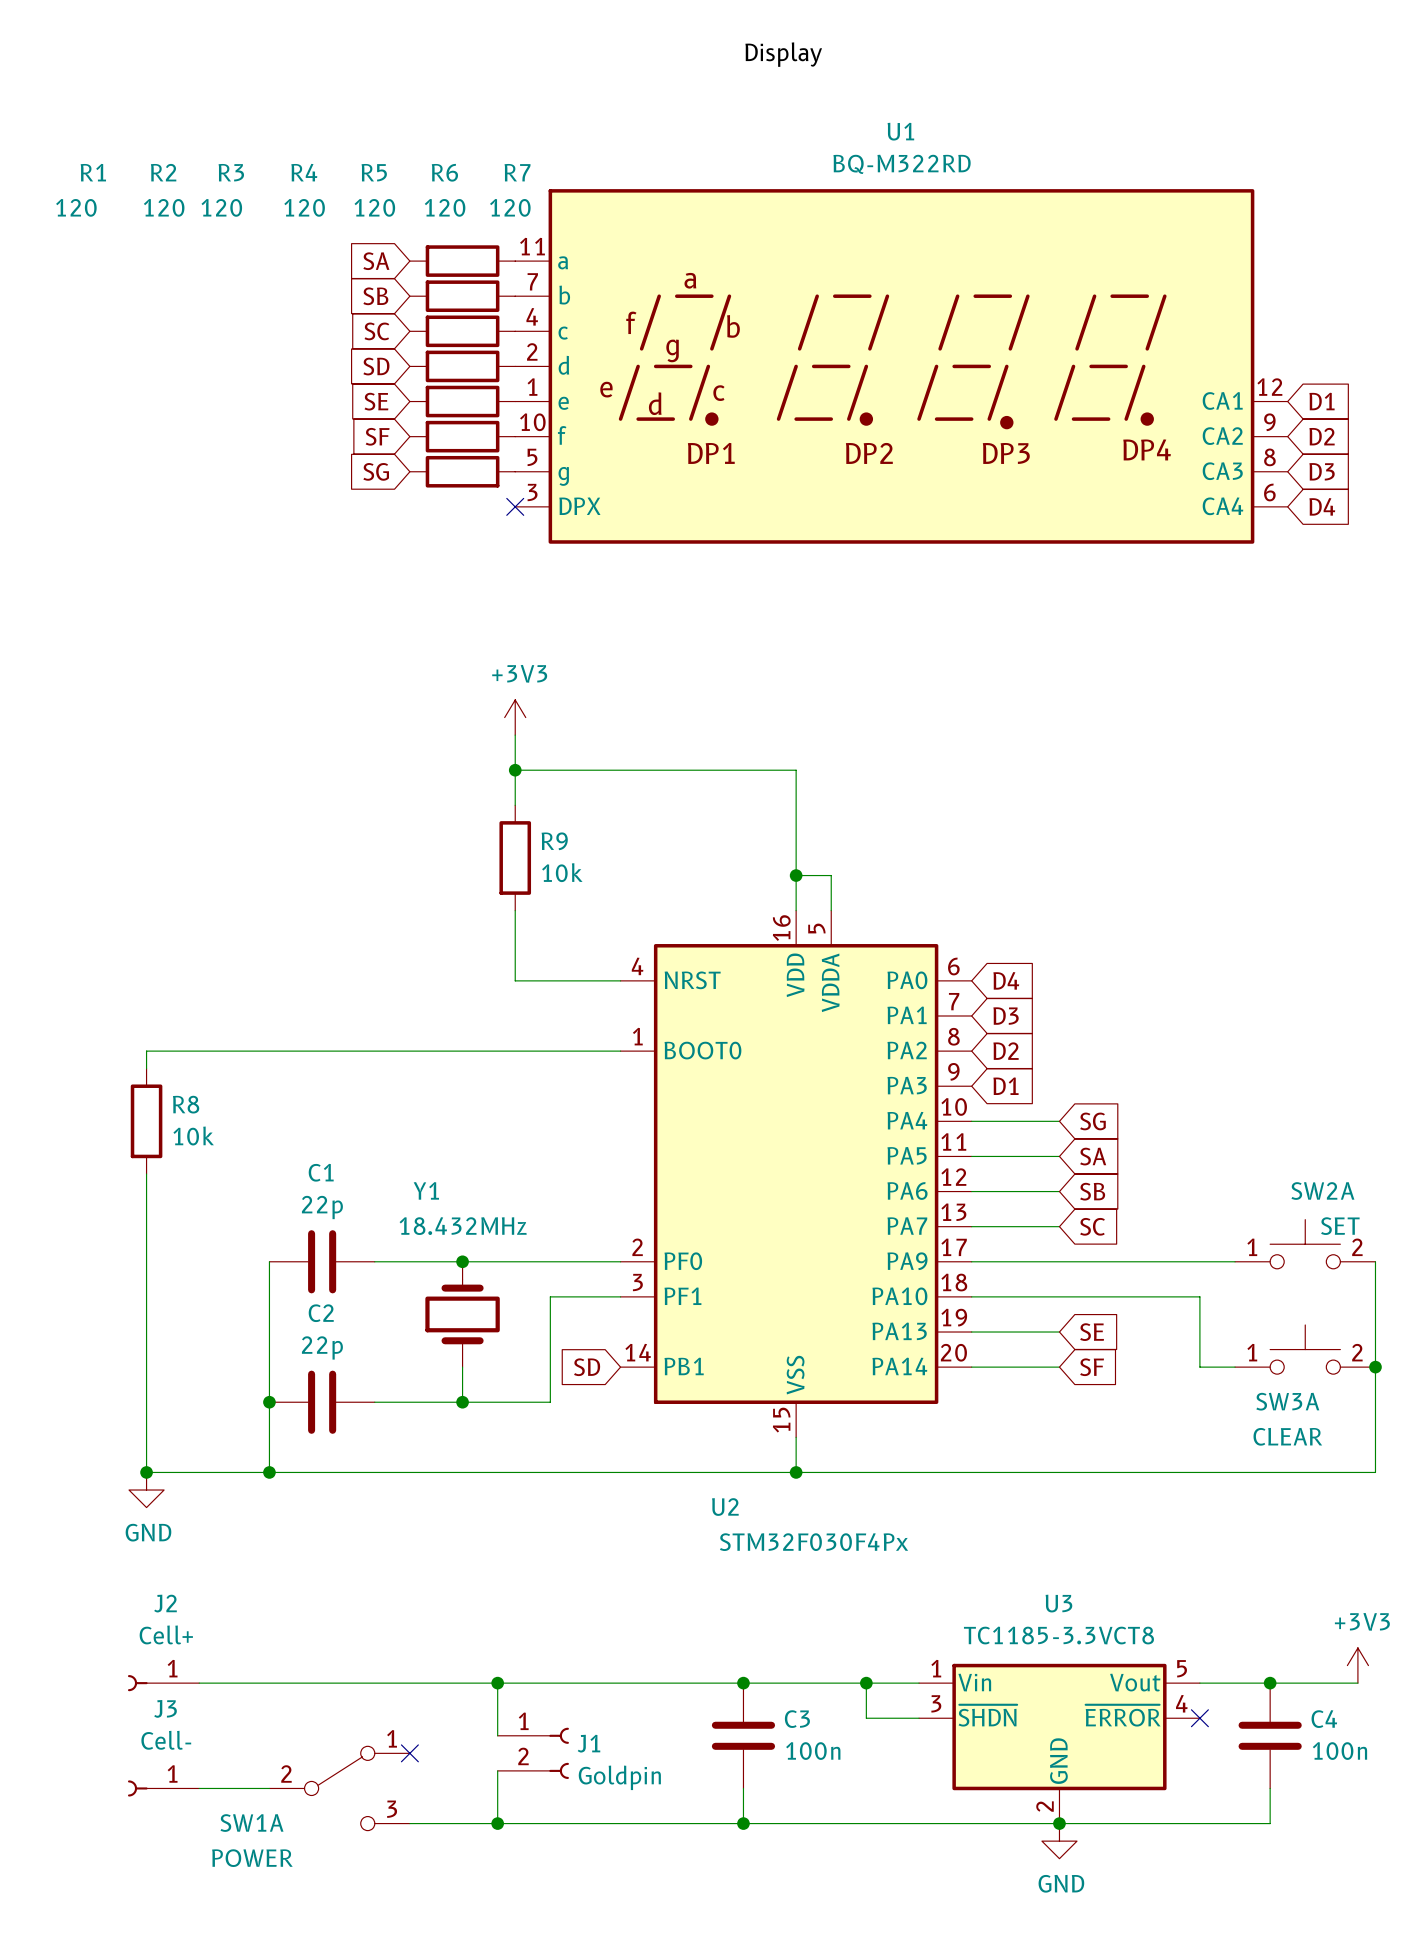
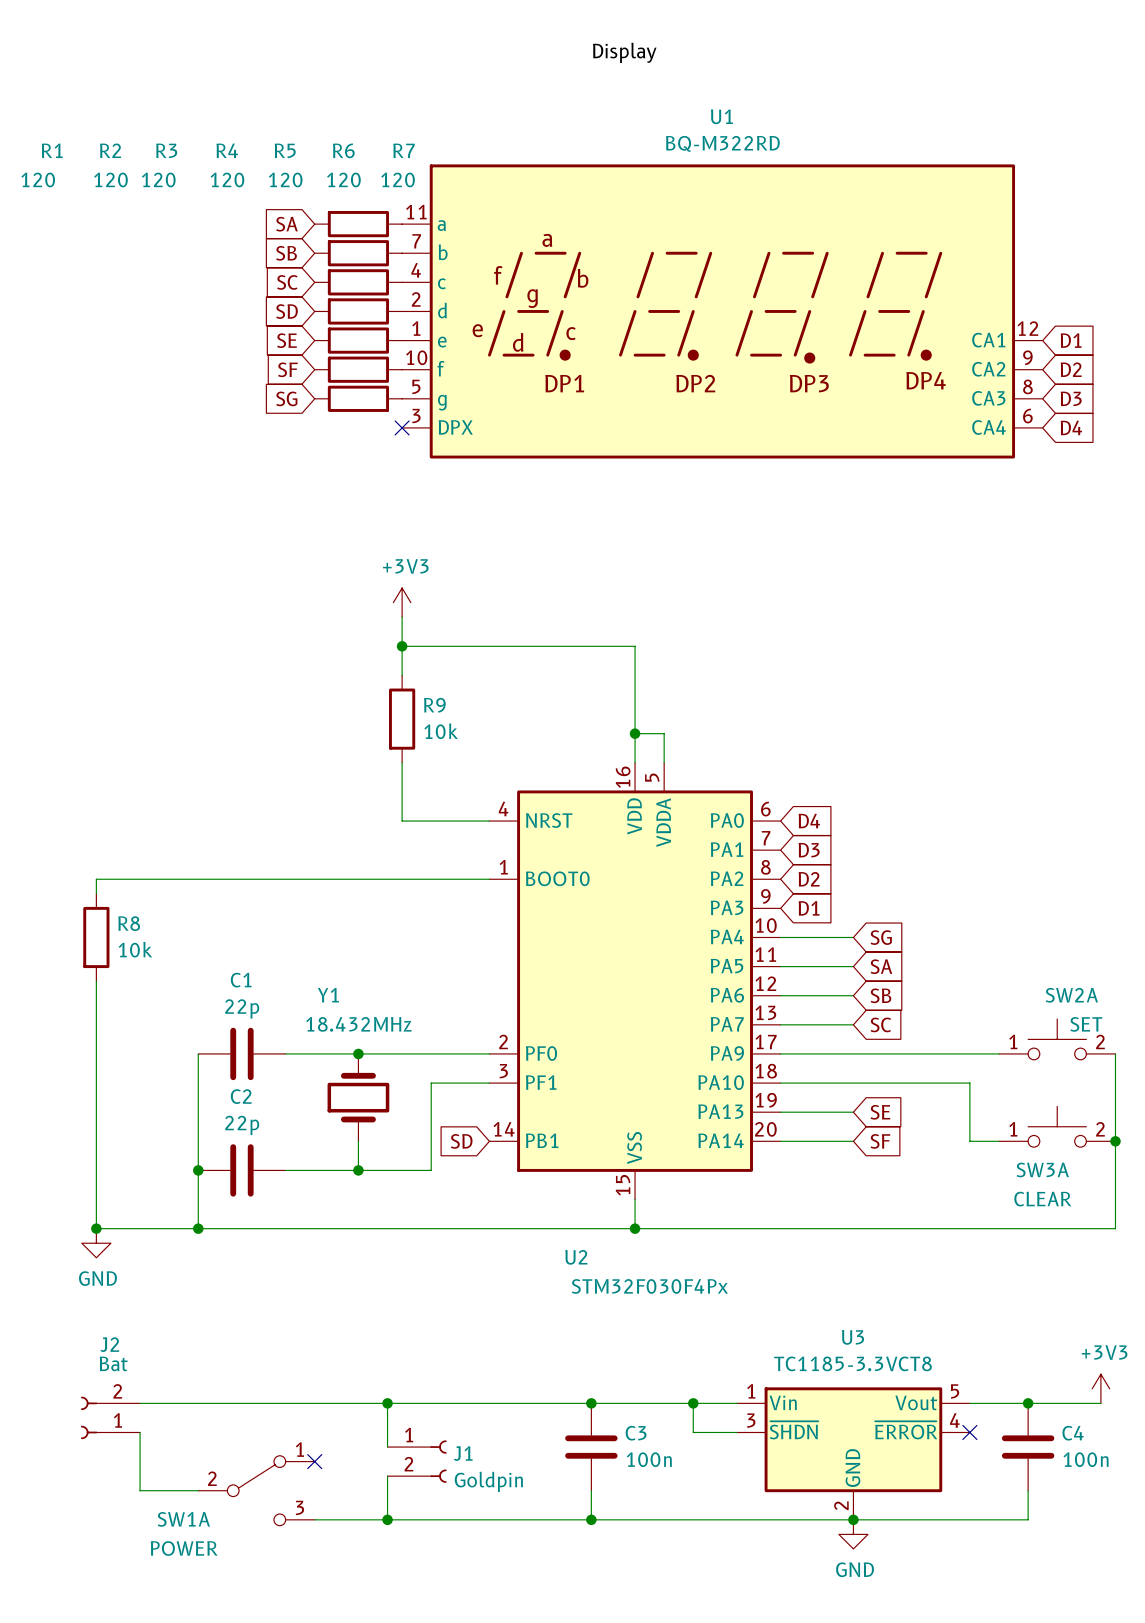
J2 value: Cell+ (166, 1634) -> Bat (113, 1363)
J2 symbol: [127, 1675, 200, 1692] -> [80, 1396, 141, 1440]
wire: none -> (140, 1432) (140, 1490)
J3: Cell- (163, 1788) -> none

